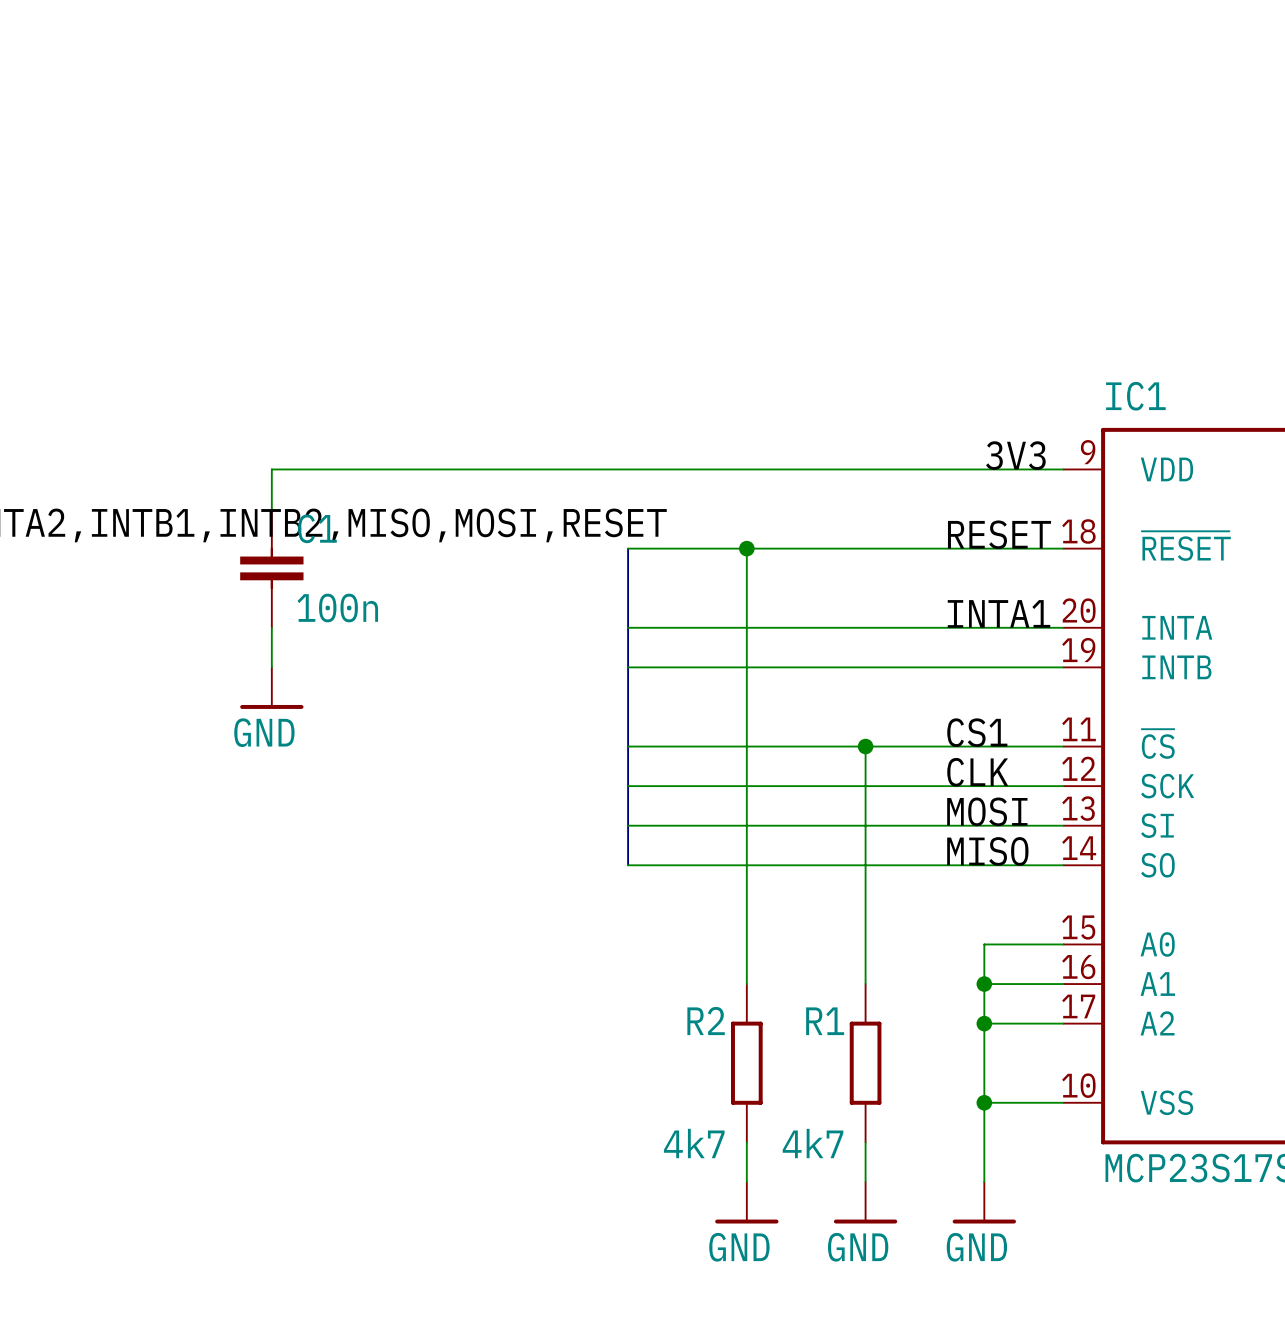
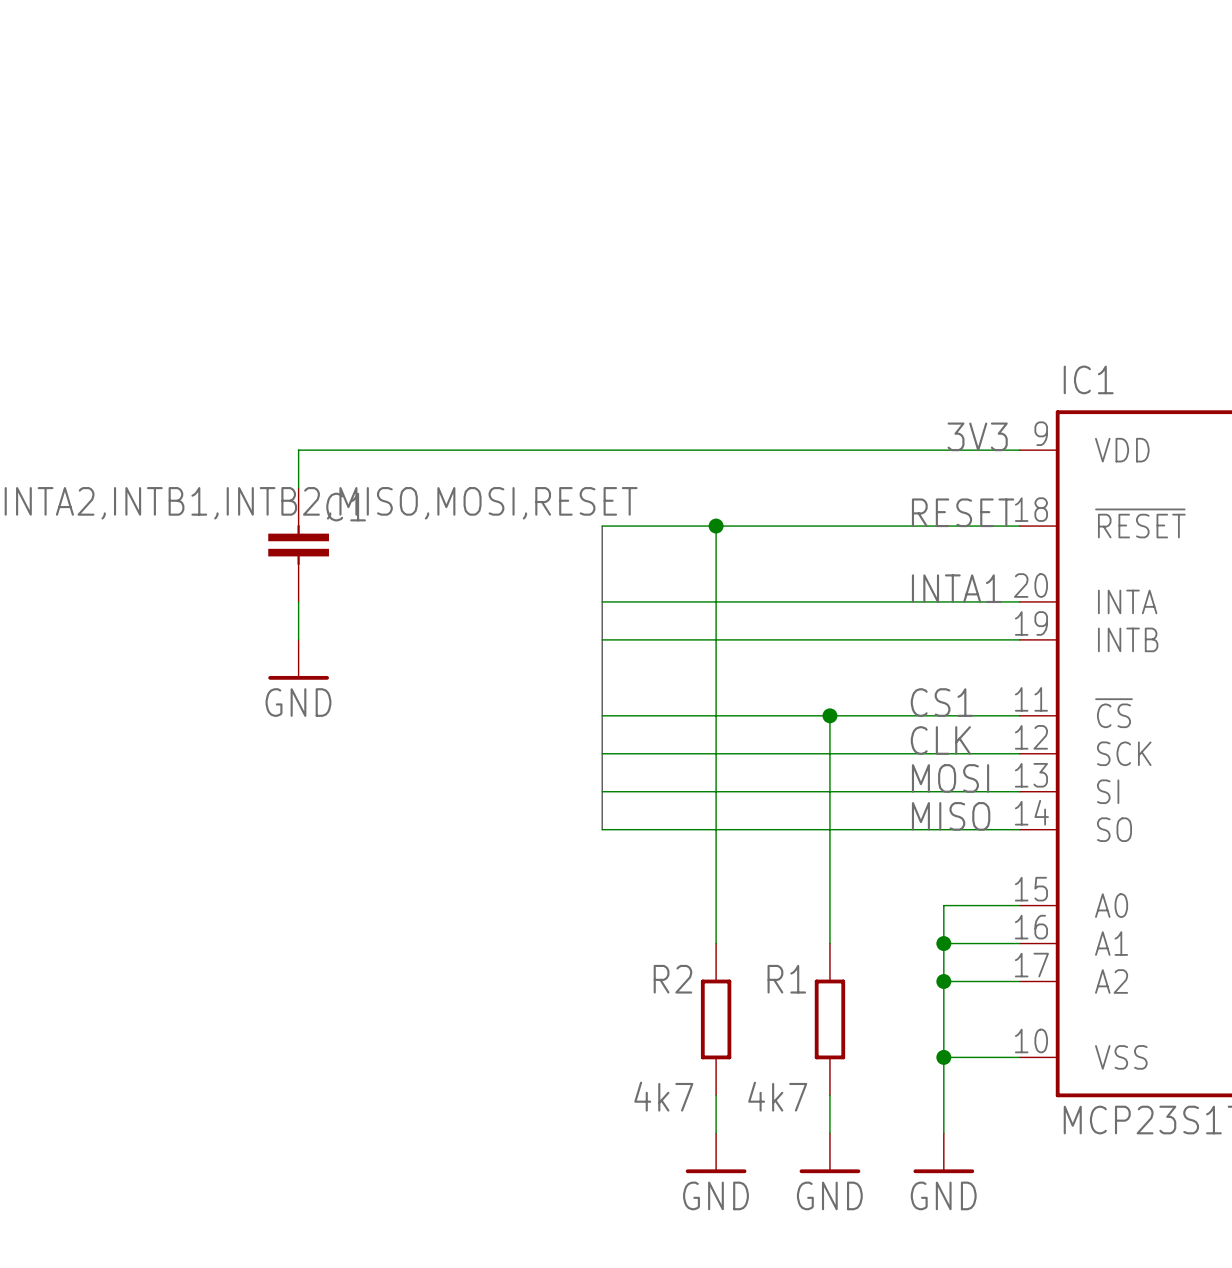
wire: (311, 469) (271, 469) (271, 509) -> (298, 450) (298, 488)
C1 position: (271, 568) -> (298, 545)
C1 value: 100n (337, 608) -> none
wire: (271, 627) (271, 667) -> (298, 601) (298, 639)
power symbol position: GND (271, 688) -> GND (298, 659)

